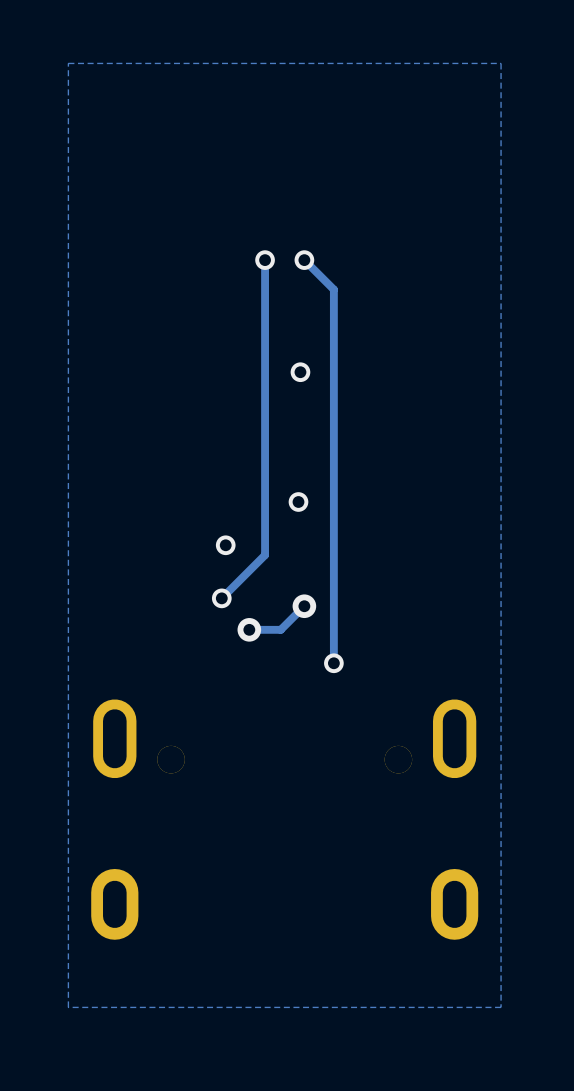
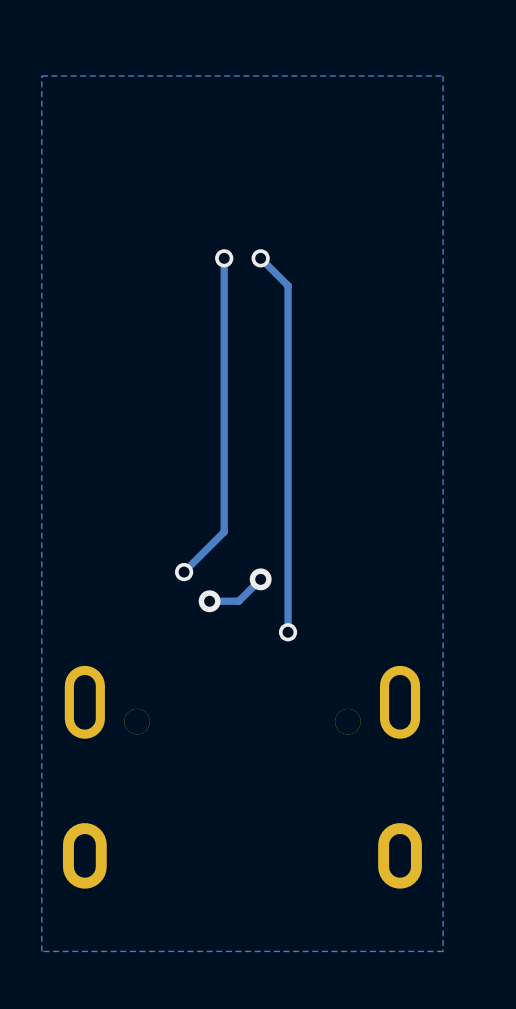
via: (300, 372) -> none
via: (298, 502) -> none
via: (225, 545) -> none

